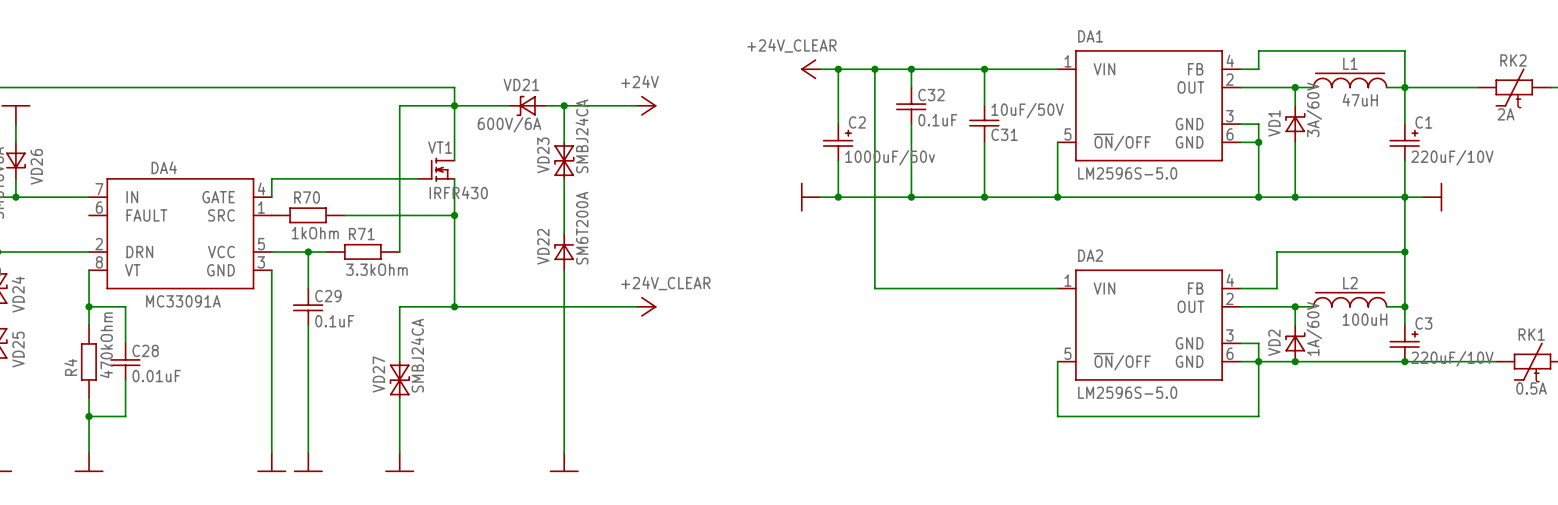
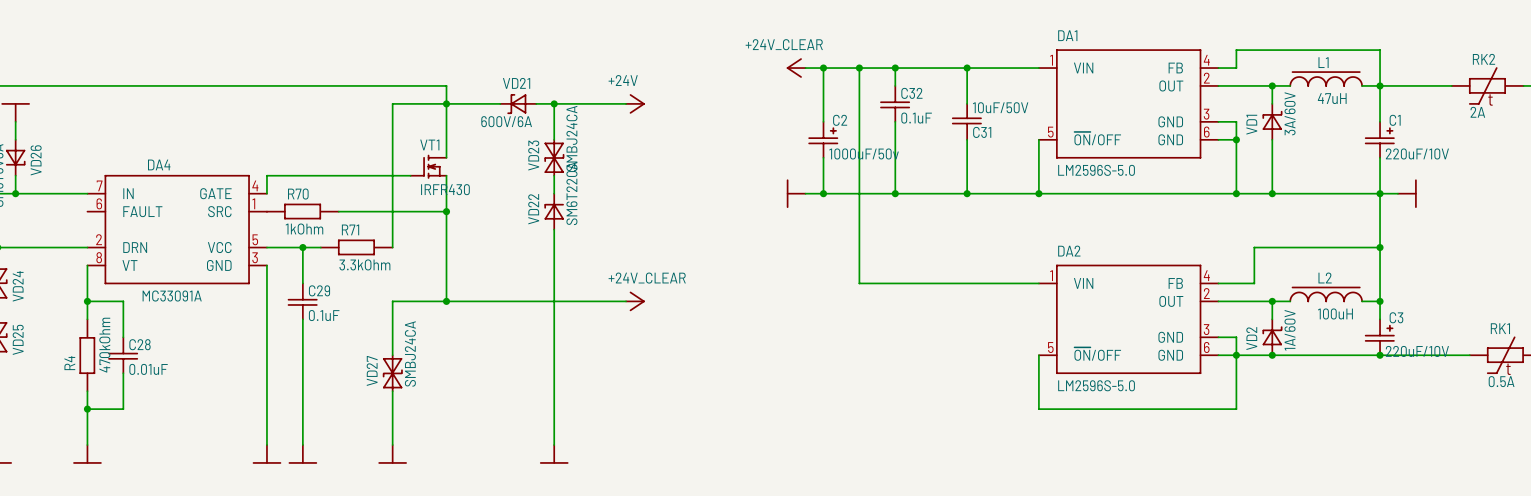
VD22 value: SM6T200A (582, 228) -> SM6T220A (571, 193)
VD22 position: (564, 252) -> (554, 211)

